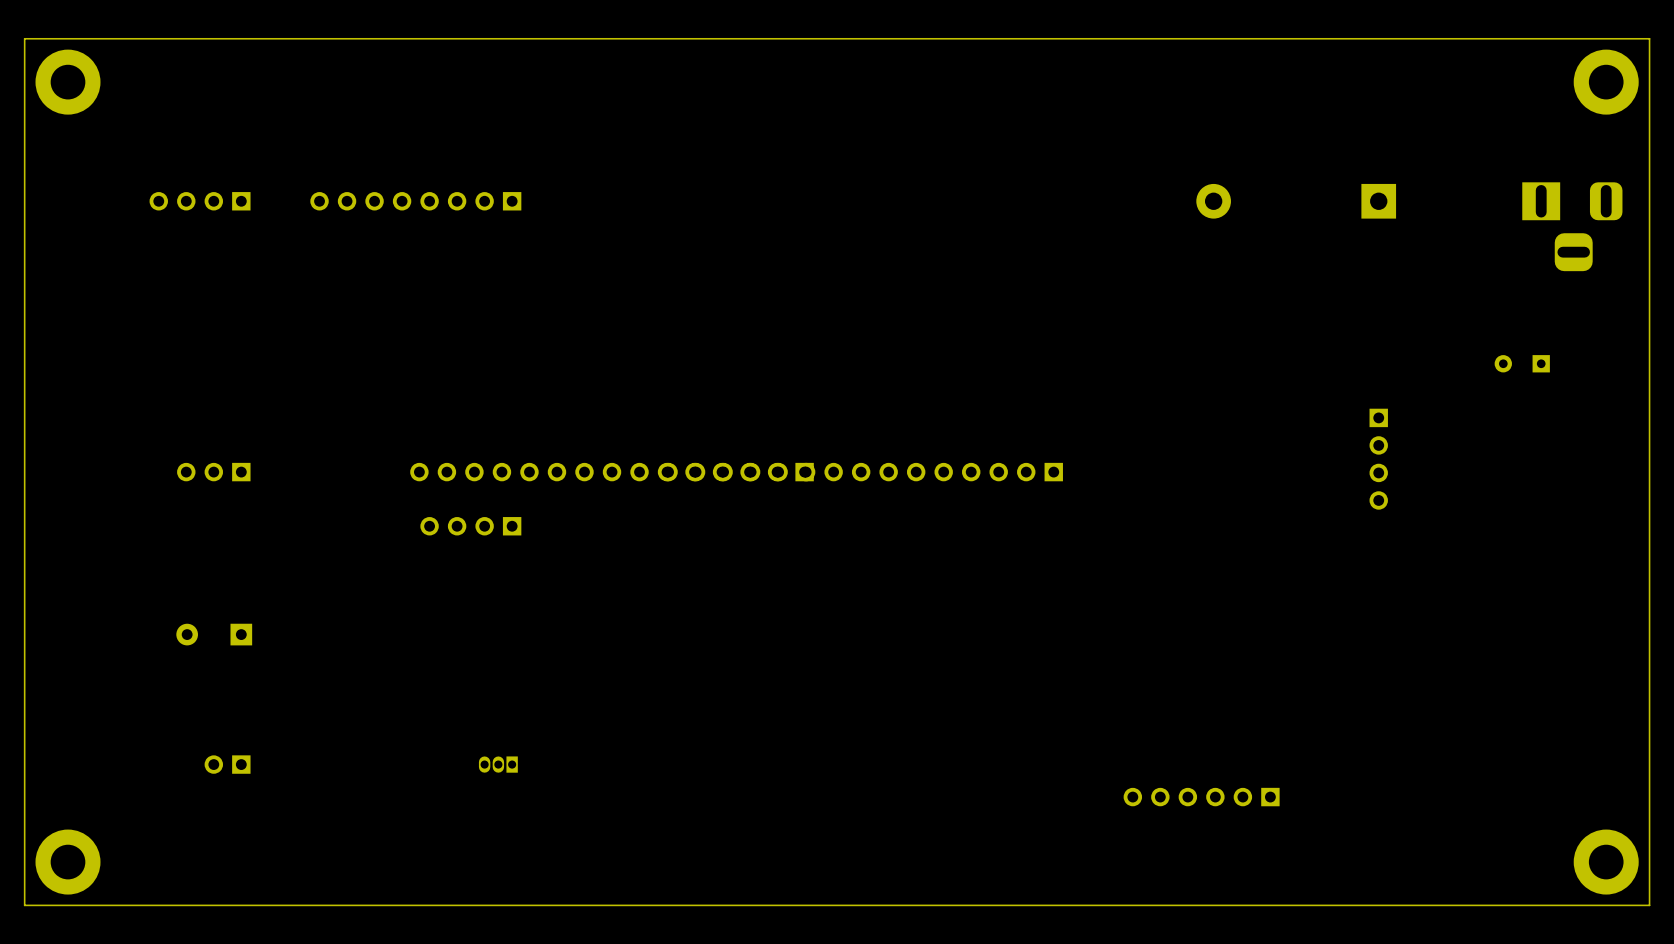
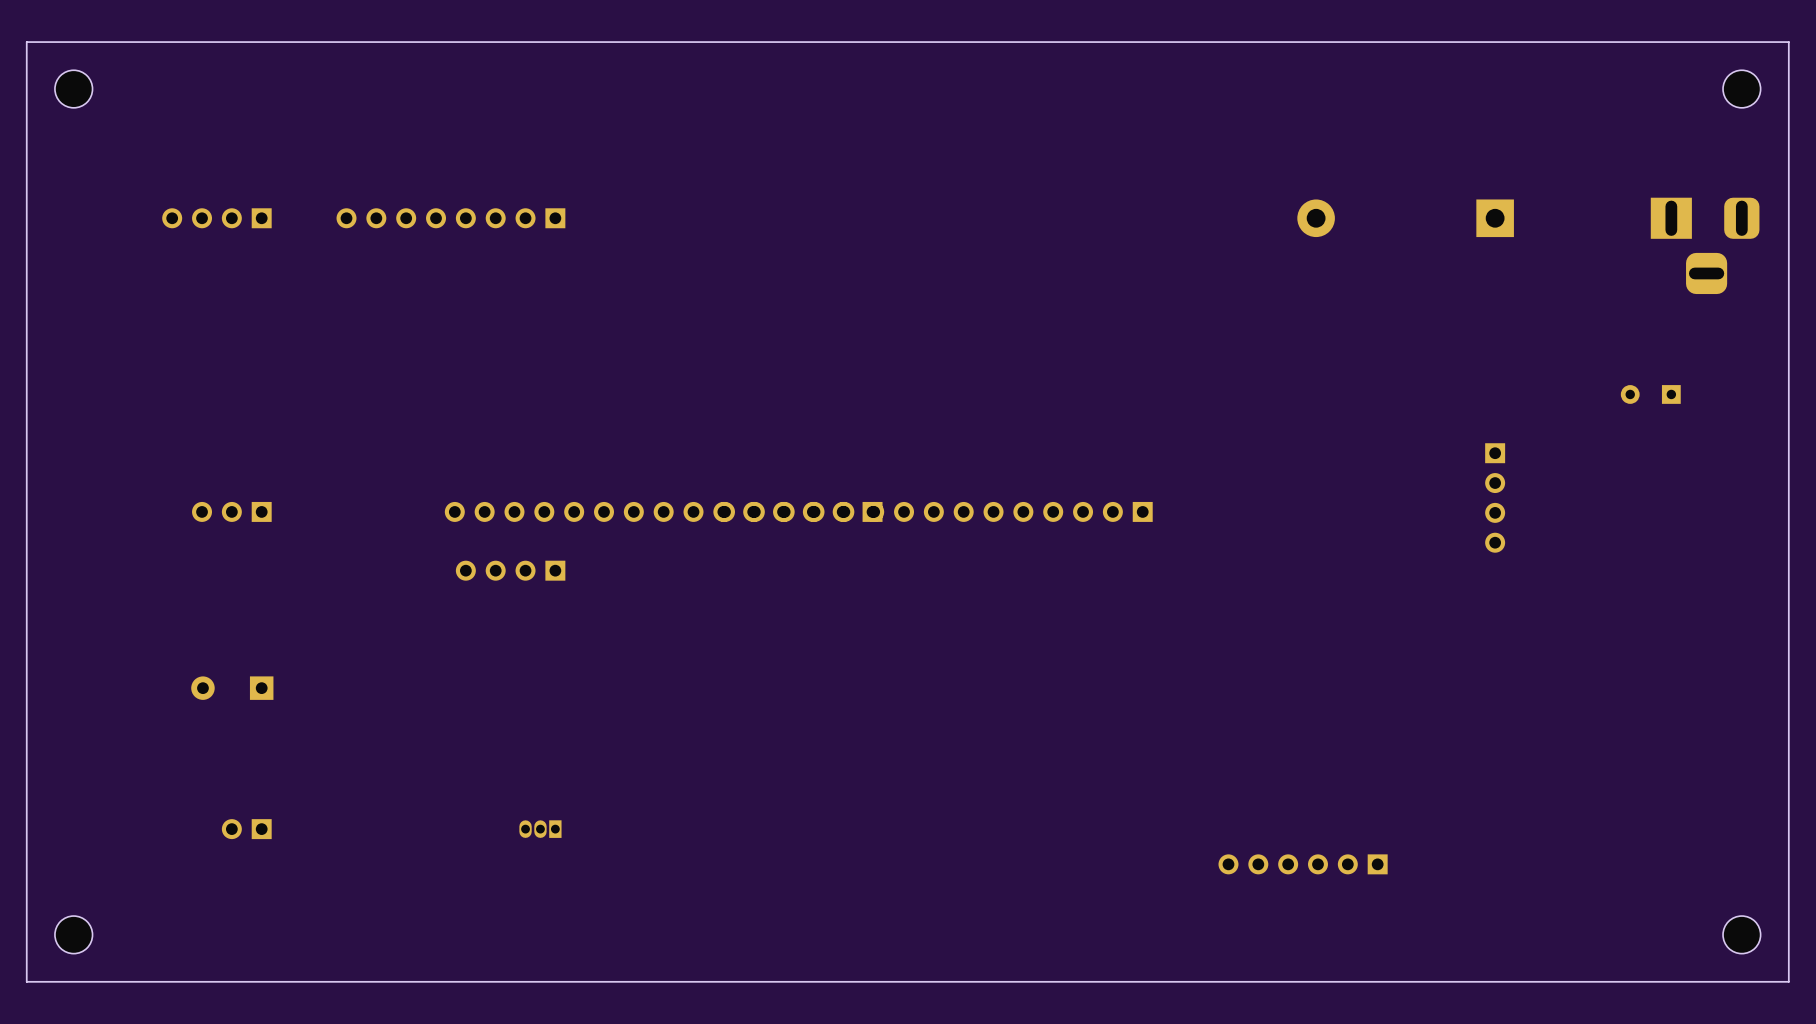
part footprint: [35, 49, 101, 115] -> [54, 70, 93, 108]
part footprint: [1573, 49, 1639, 115] -> [1723, 70, 1761, 108]
part footprint: [35, 829, 101, 895] -> [54, 916, 93, 954]
part footprint: [1573, 829, 1639, 895] -> [1723, 916, 1761, 954]

